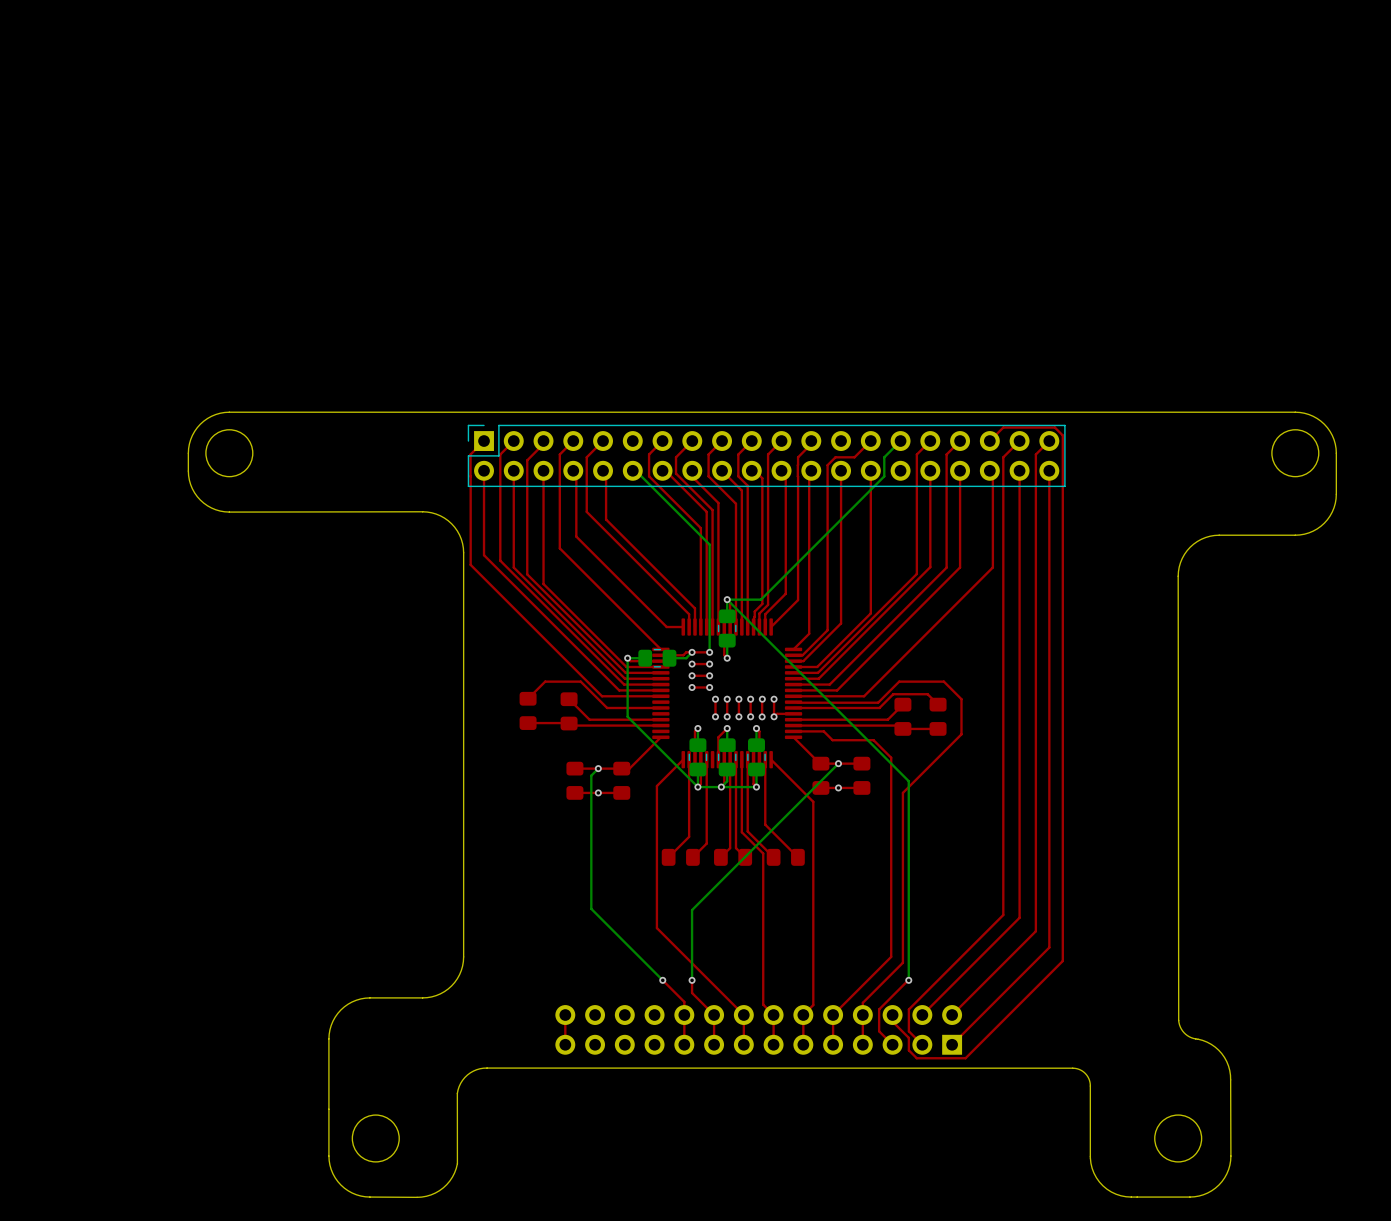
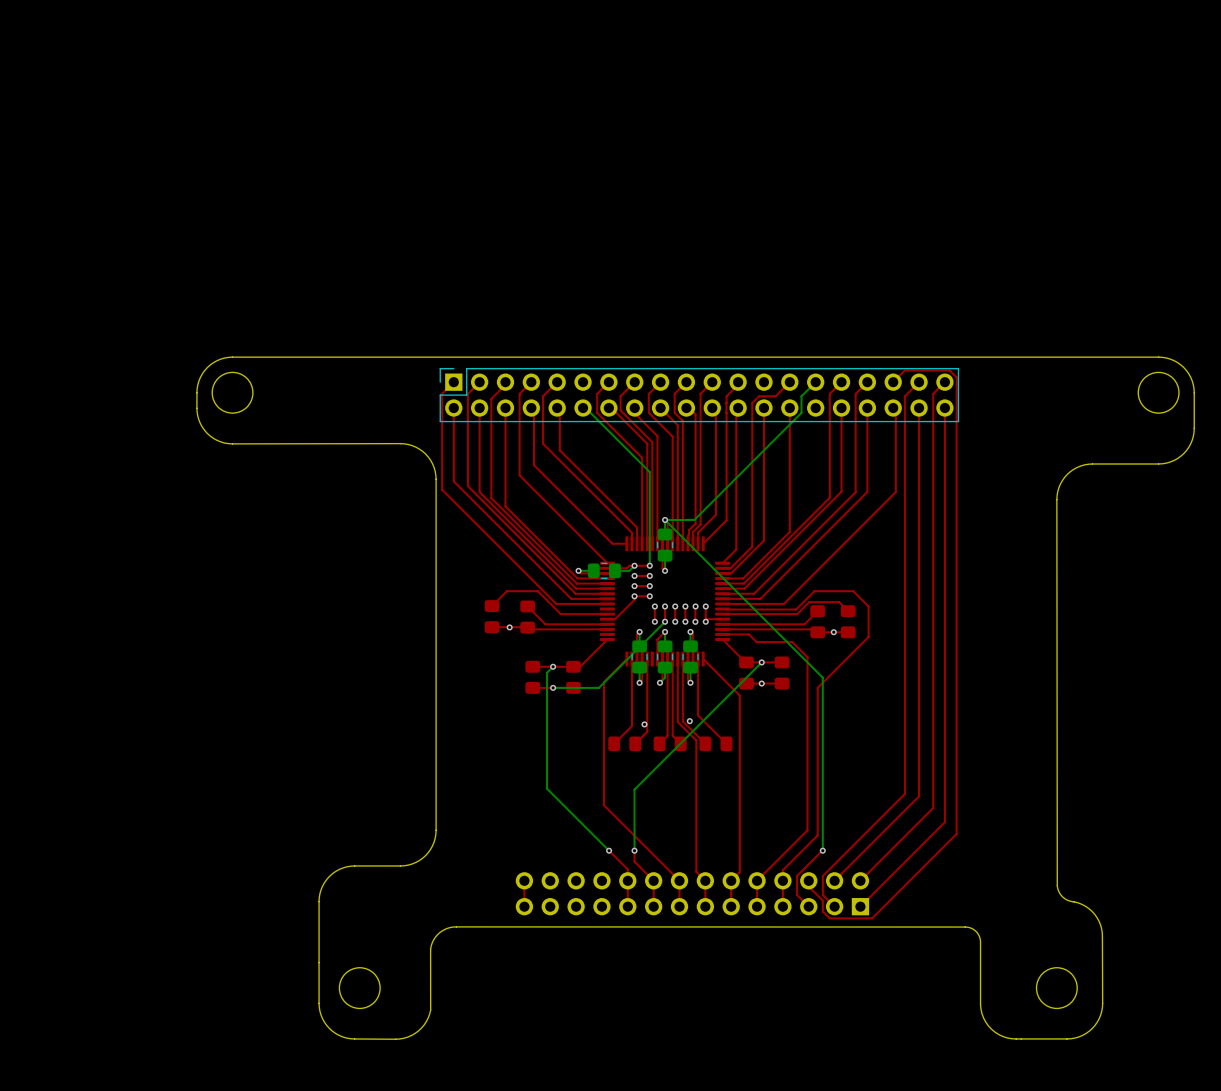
bottom track: (627, 658) (627, 716) (697, 787) (756, 787) -> none
top track: none -> (634, 596) (634, 599) (615, 619) (607, 619)
bottom track: none -> (665, 621) (598, 687) (553, 687)
via: none -> (509, 627)
via: none -> (833, 632)
via: none -> (689, 721)
via: none -> (644, 724)

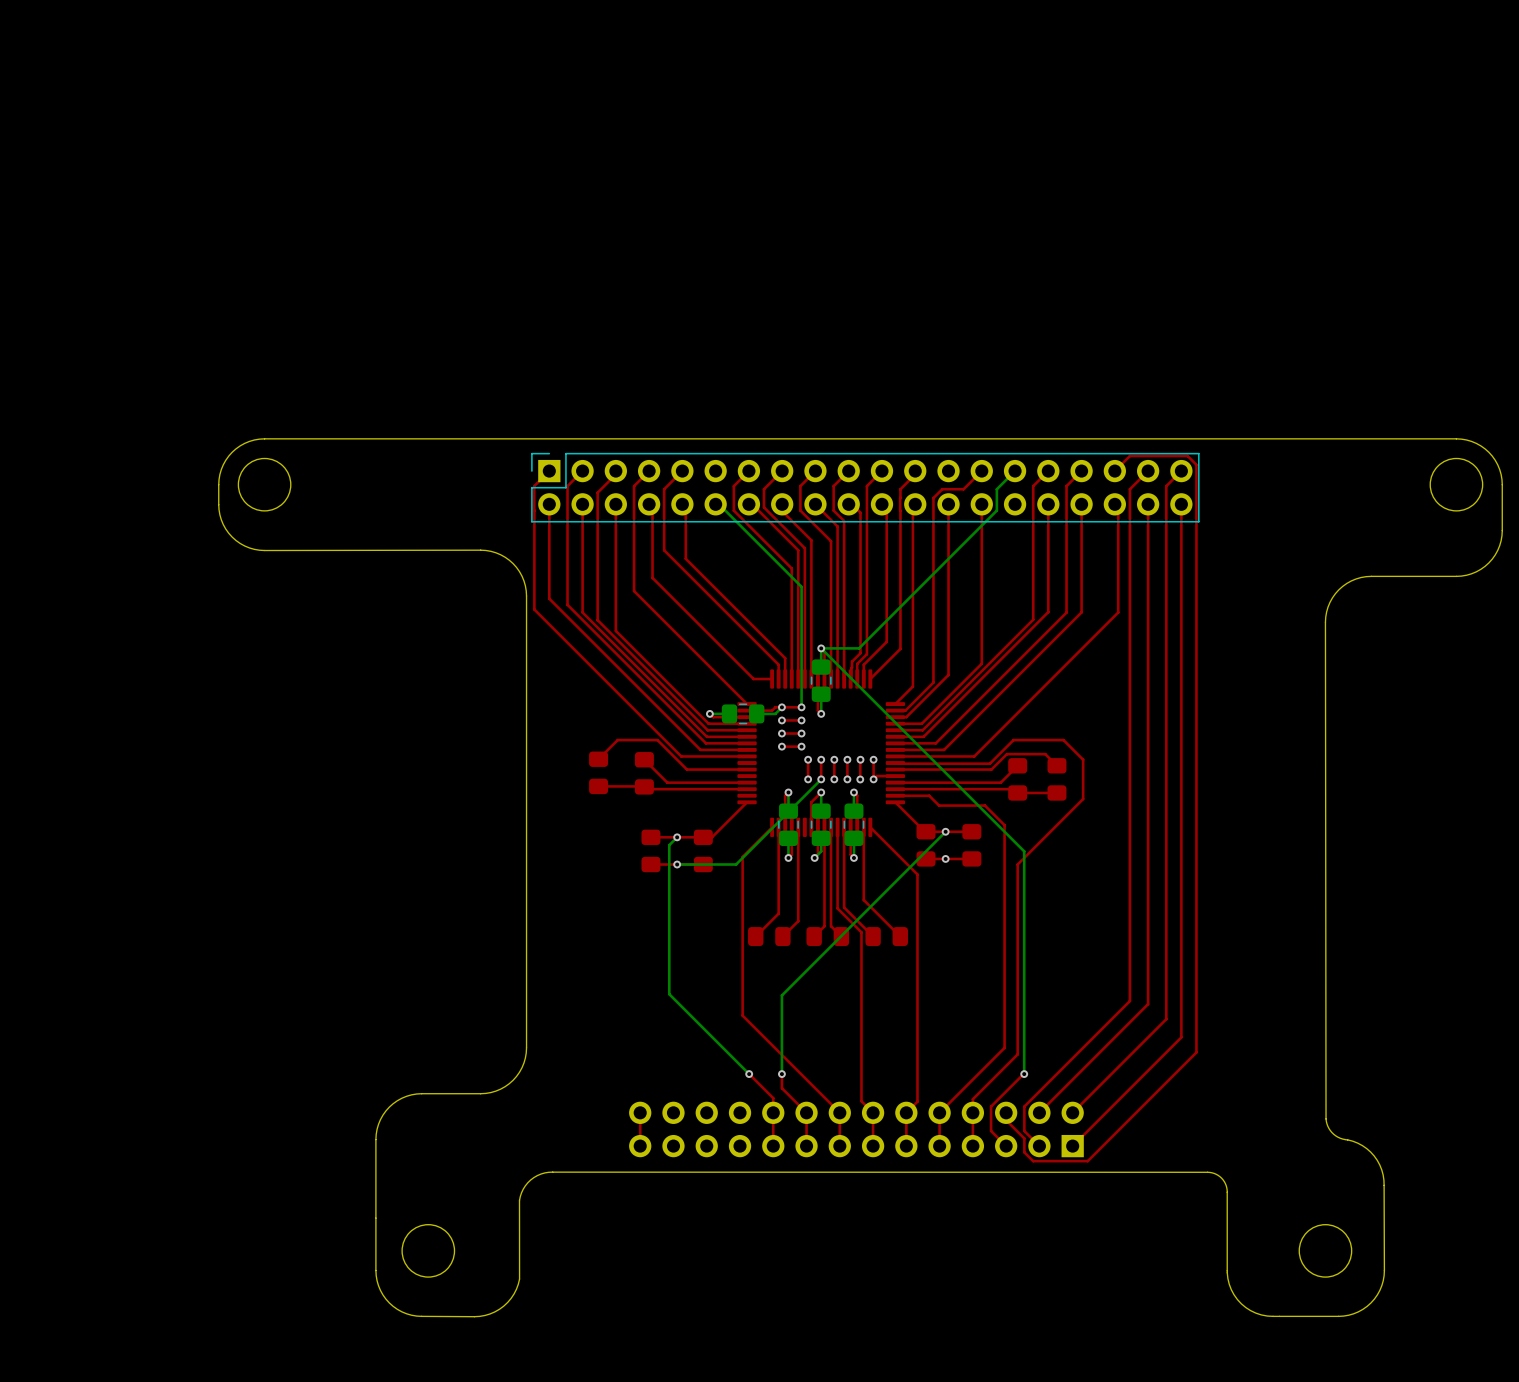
top track: (634, 596) (634, 599) (615, 619) (607, 619) -> none
via: (509, 627) -> none
via: (833, 632) -> none
via: (689, 721) -> none
via: (644, 724) -> none

